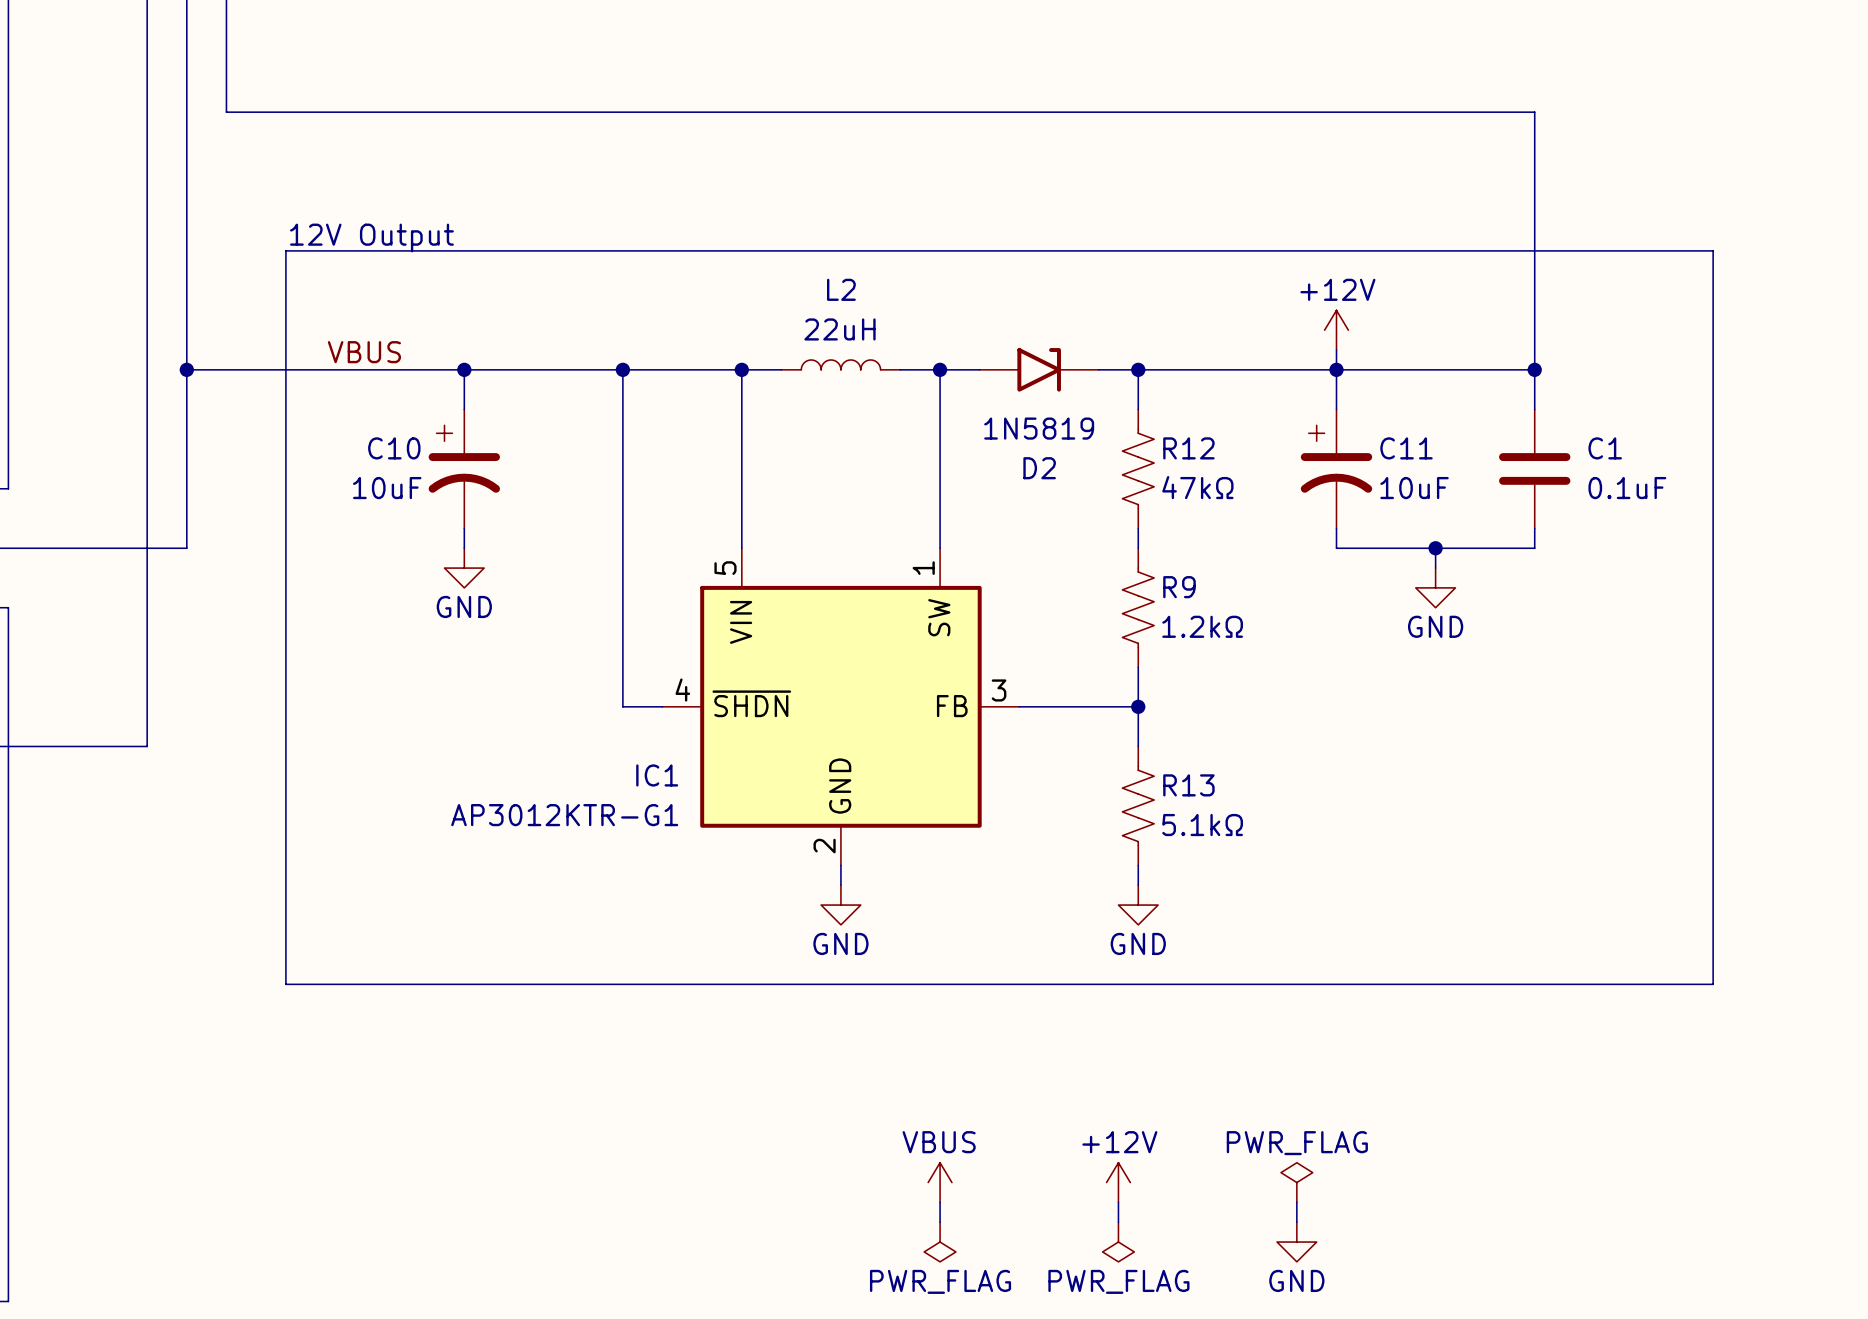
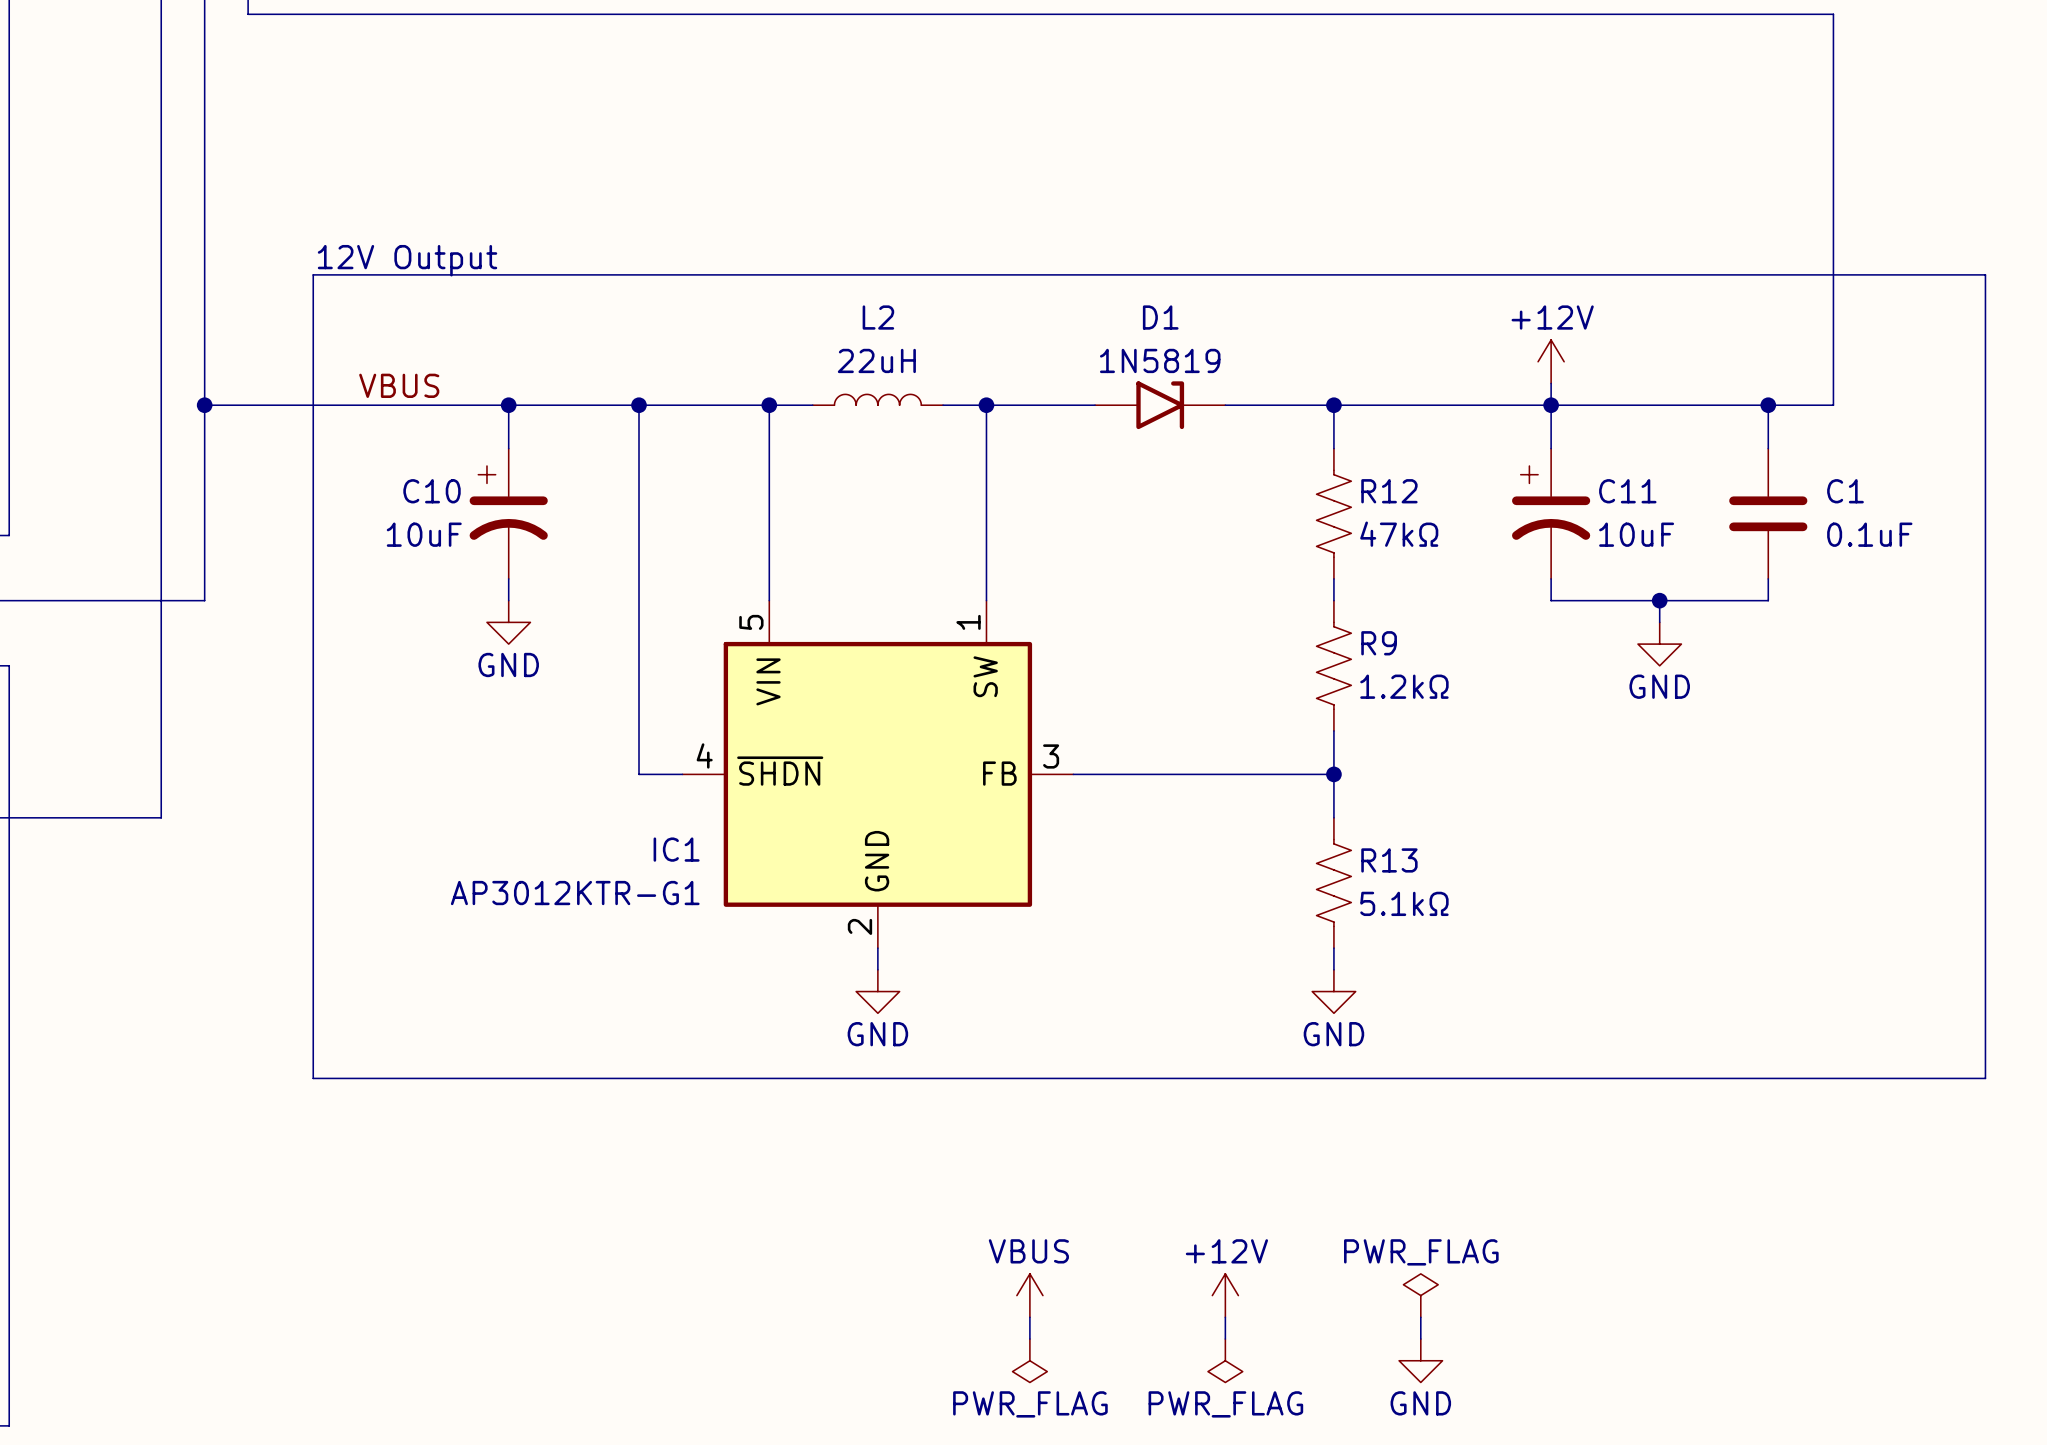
wire: (226, 13) (226, 112) (1534, 112) (1534, 409) -> (248, 14) (1833, 14) (1833, 405) (1681, 405)
line: (1713, 250) (1713, 984) -> (1876, 274) (1985, 274) (1985, 1078) (1876, 1078)
power symbol position: +12V (1336, 330) -> +12V (1551, 361)
wire: (1336, 350) (1336, 409) -> (1551, 383) (1551, 448)
L2 position: (840, 364) -> (877, 399)
junction: none -> (639, 405)
wire: (622, 369) (622, 706) (662, 706) -> (639, 405) (639, 774) (682, 774)
junction: (622, 369) -> none
junction: none -> (769, 405)
junction: (741, 369) -> none
wire: (781, 369) (741, 369) (741, 548) -> none
wire: none -> (943, 405) (986, 405) (986, 600)
wire: (940, 369) (940, 548) -> (769, 405) (769, 600)
junction position: (940, 369) -> (986, 405)
D2: 1N5819 (1039, 369) -> none
D1: none -> 1N5819 (1160, 405)
wire: (1138, 369) (1138, 409) -> (1333, 405) (1333, 448)
junction: (1138, 369) -> none
junction: none -> (1333, 405)
junction: (1336, 369) -> none
junction: none -> (1551, 405)
junction: (1534, 369) -> none
wire: none -> (1768, 405) (1768, 448)
junction: none -> (1768, 405)
R12 position: (1138, 468) -> (1333, 513)
C11 position: (1336, 468) -> (1551, 513)
C1 position: (1534, 468) -> (1768, 513)
wire: (1138, 528) (1138, 548) -> (1333, 578) (1333, 600)
wire: (1336, 528) (1336, 548) (1415, 548) -> (1551, 578) (1551, 600)
wire: (1534, 528) (1534, 548) -> (1768, 578) (1768, 600) (1681, 600)
wire: (1435, 548) (1435, 568) -> (1659, 600) (1659, 622)
junction position: (1435, 548) -> (1659, 600)
power symbol position: GND (1435, 587) -> GND (1659, 644)
R9 position: (1138, 607) -> (1333, 665)
wire: (1138, 667) (1138, 746) -> (1333, 730) (1333, 817)
IC1 position: (840, 706) -> (877, 774)
wire: none -> (1247, 774) (1333, 774)
junction position: (1138, 706) -> (1333, 774)
R13 position: (1138, 805) -> (1333, 882)
wire: (840, 865) (840, 885) -> (877, 948) (877, 969)
wire: (1138, 865) (1138, 885) -> (1333, 948) (1333, 969)
power symbol position: GND (840, 905) -> GND (877, 991)
power symbol position: GND (1138, 905) -> GND (1333, 991)

